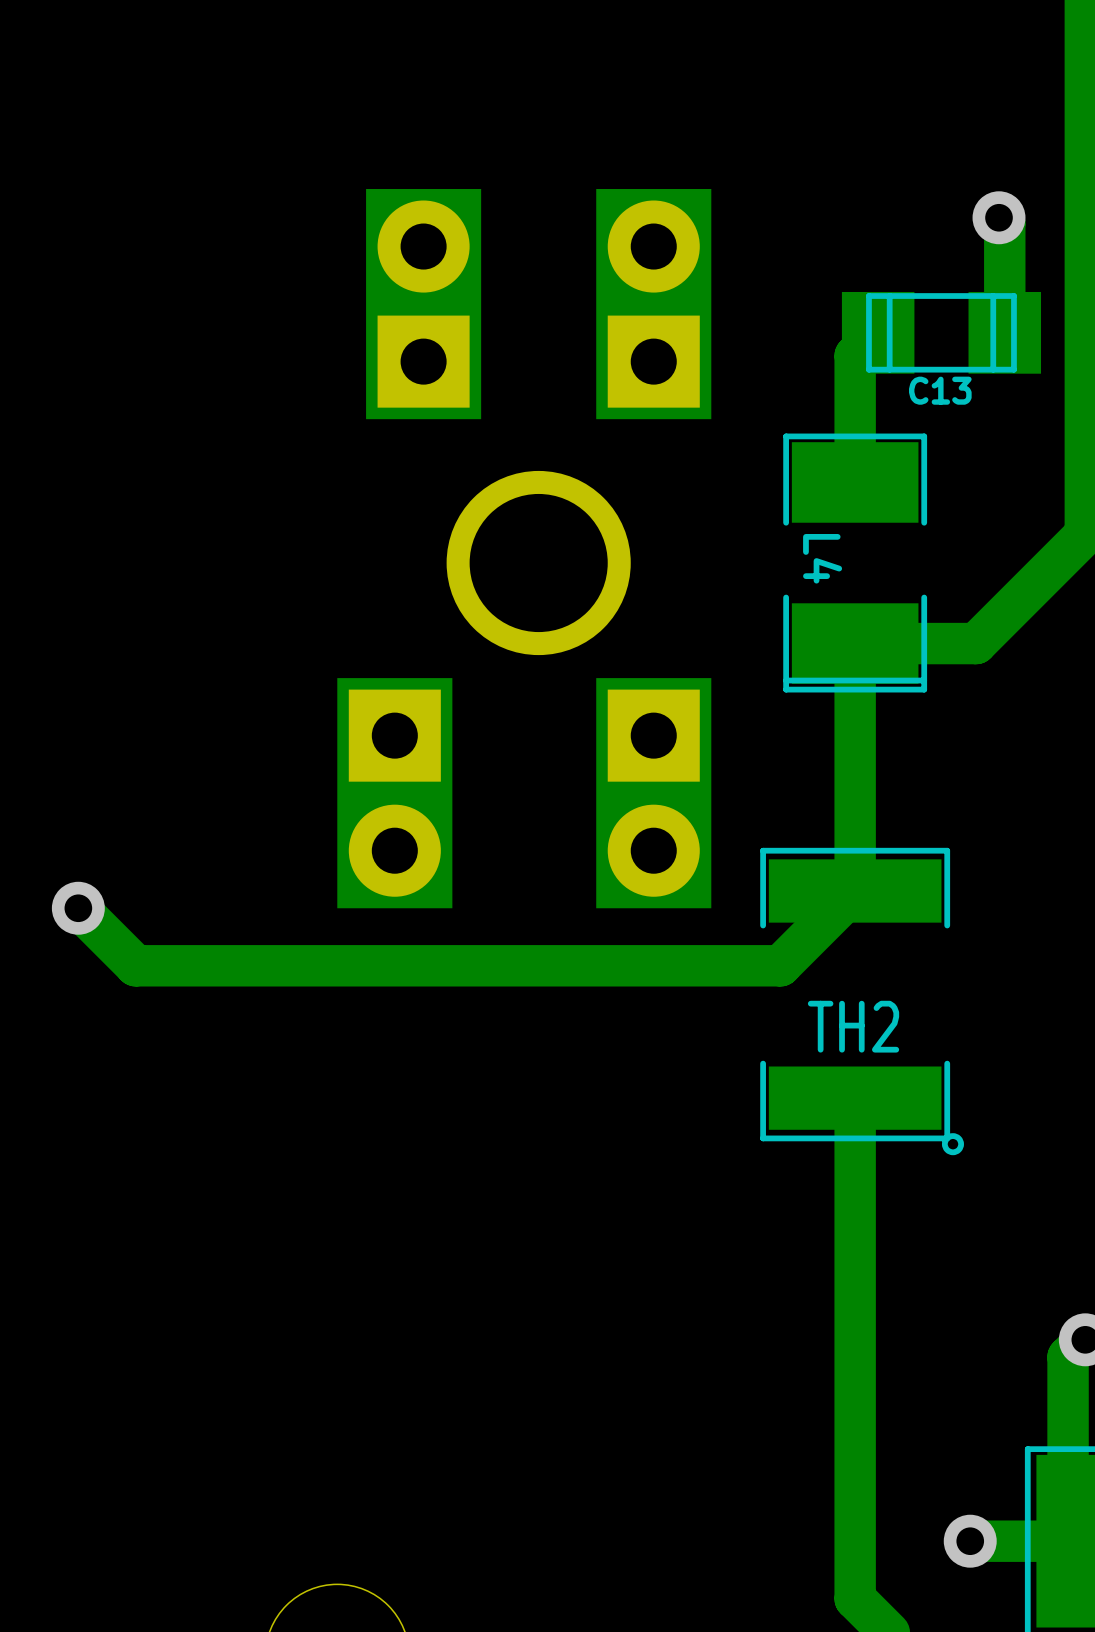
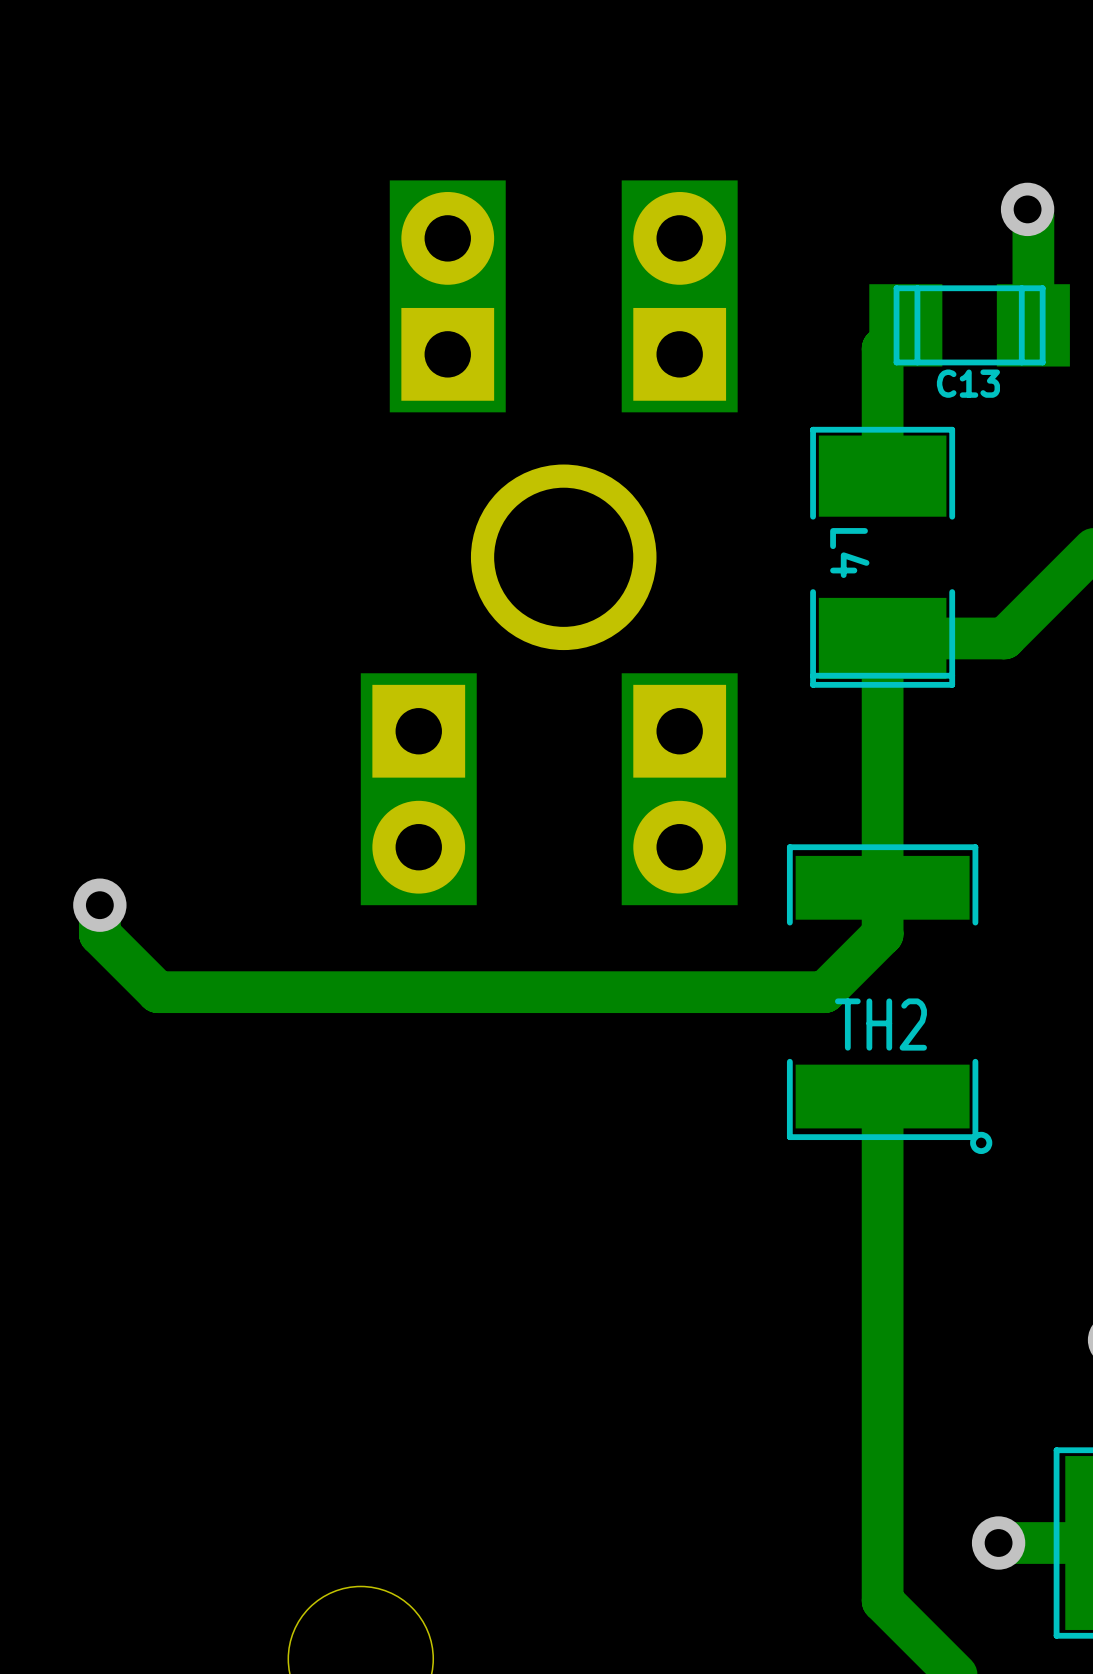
track: (855, 890) (780, 965) (135, 965) (78, 908) -> (882, 887) (882, 934) (824, 992) (157, 992) (99, 934) (99, 905)

